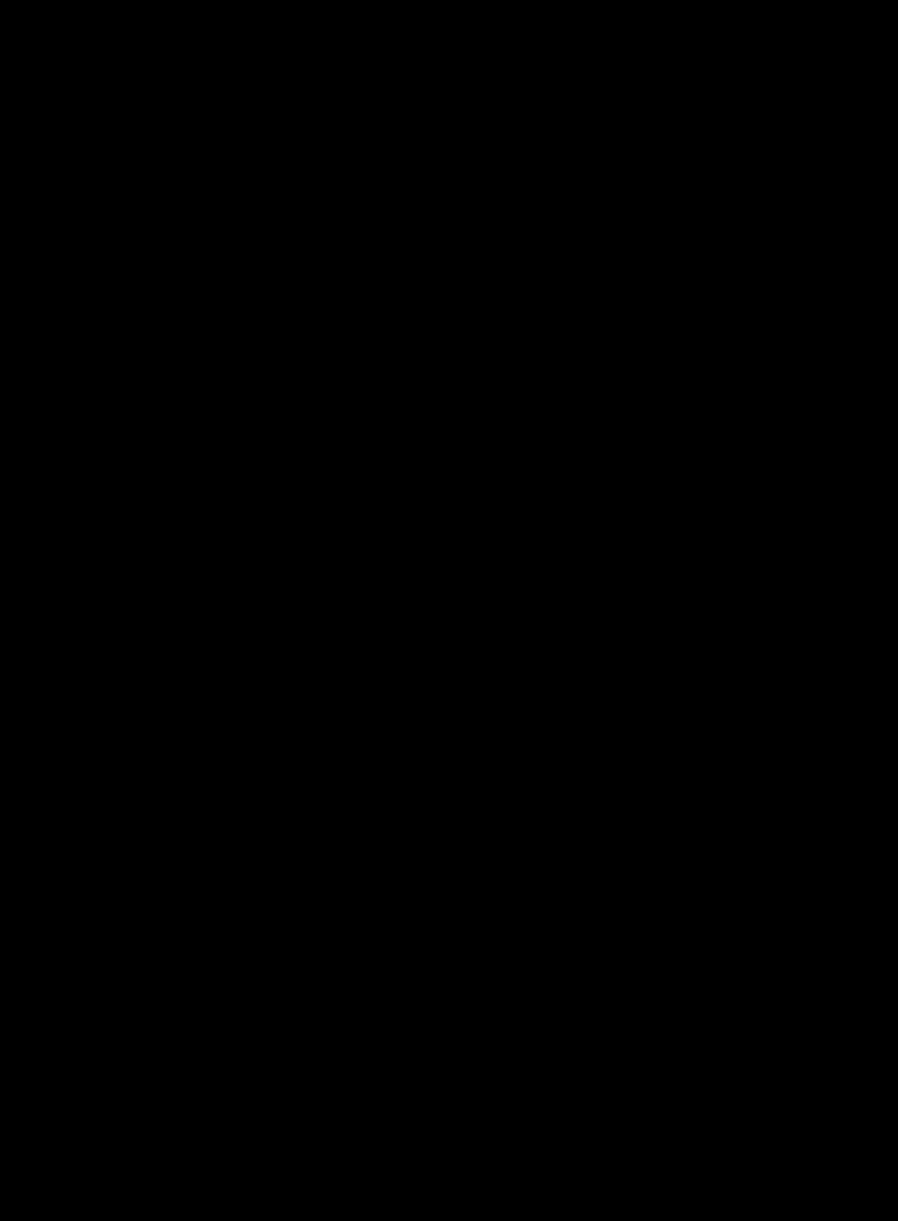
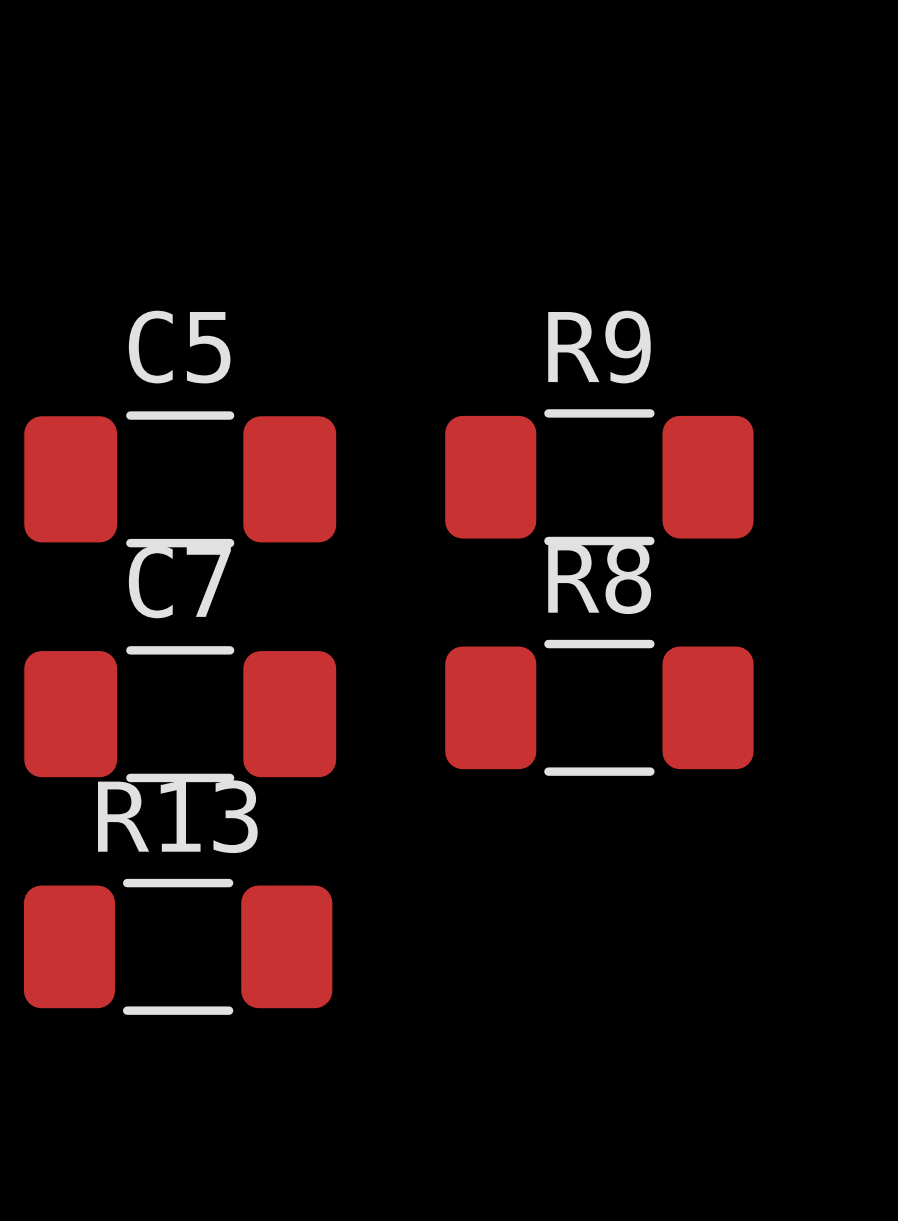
R9: none -> (599, 477)
C5: none -> (180, 479)
R8: none -> (599, 707)
C7: none -> (180, 714)
R13: none -> (178, 946)

